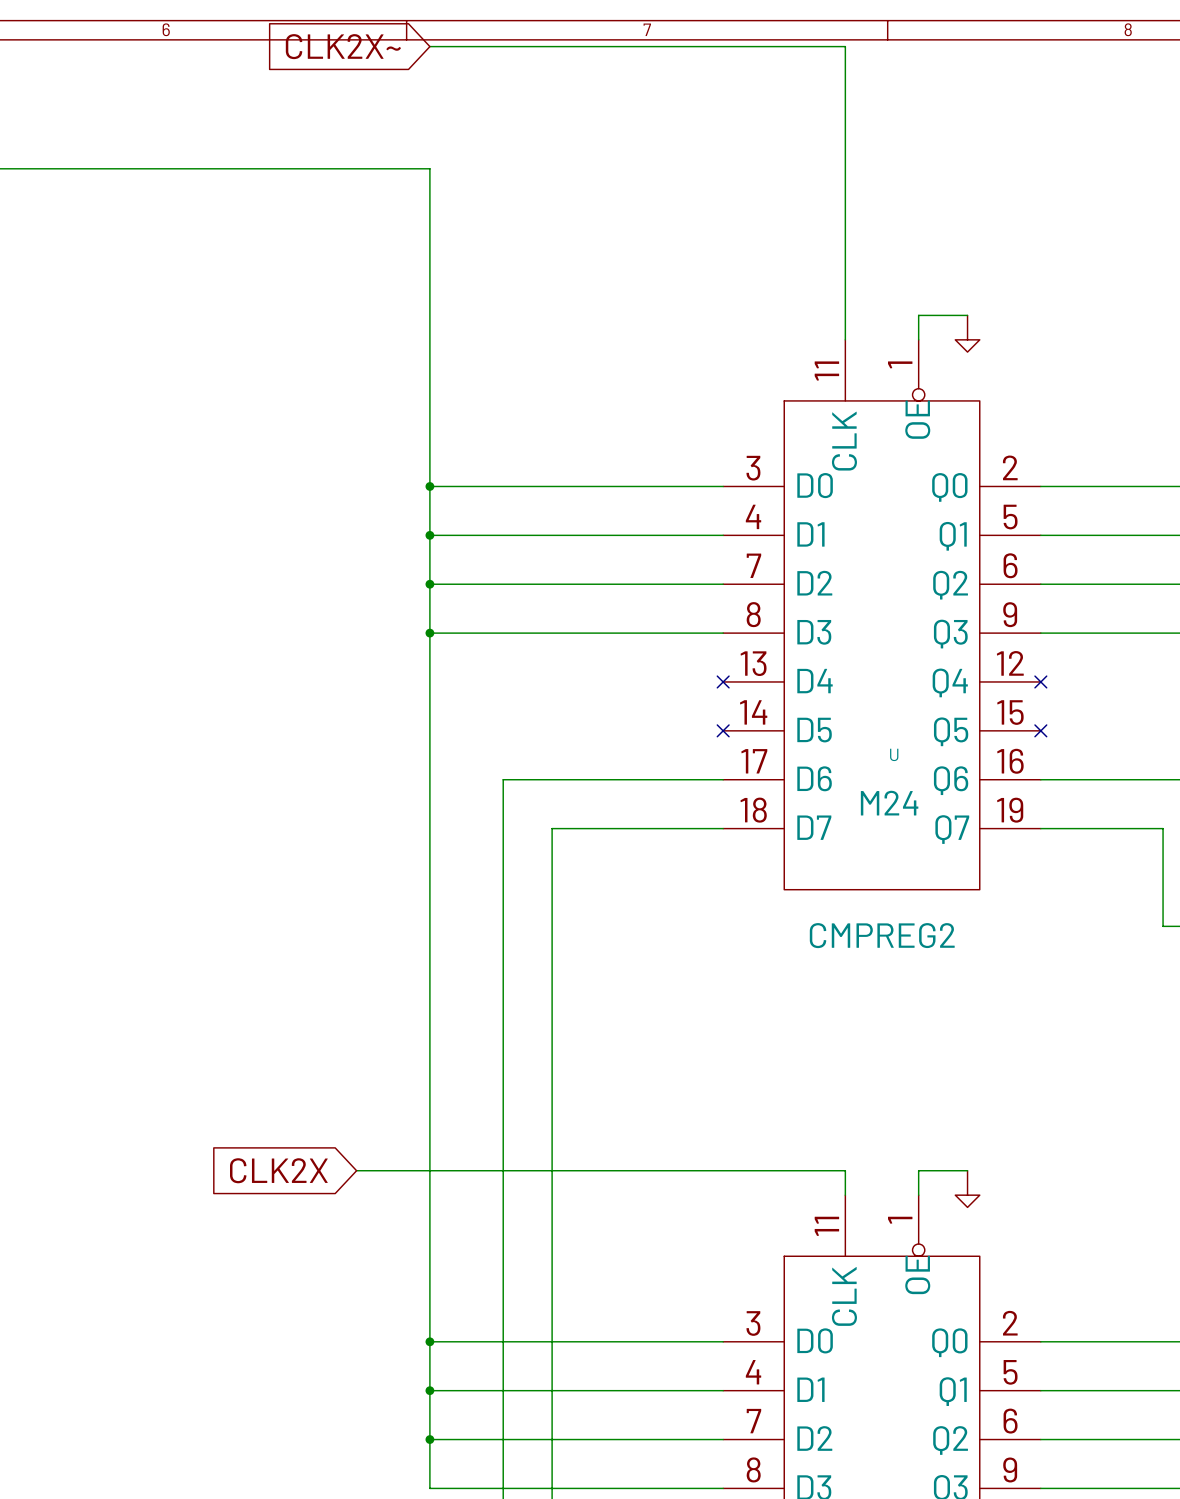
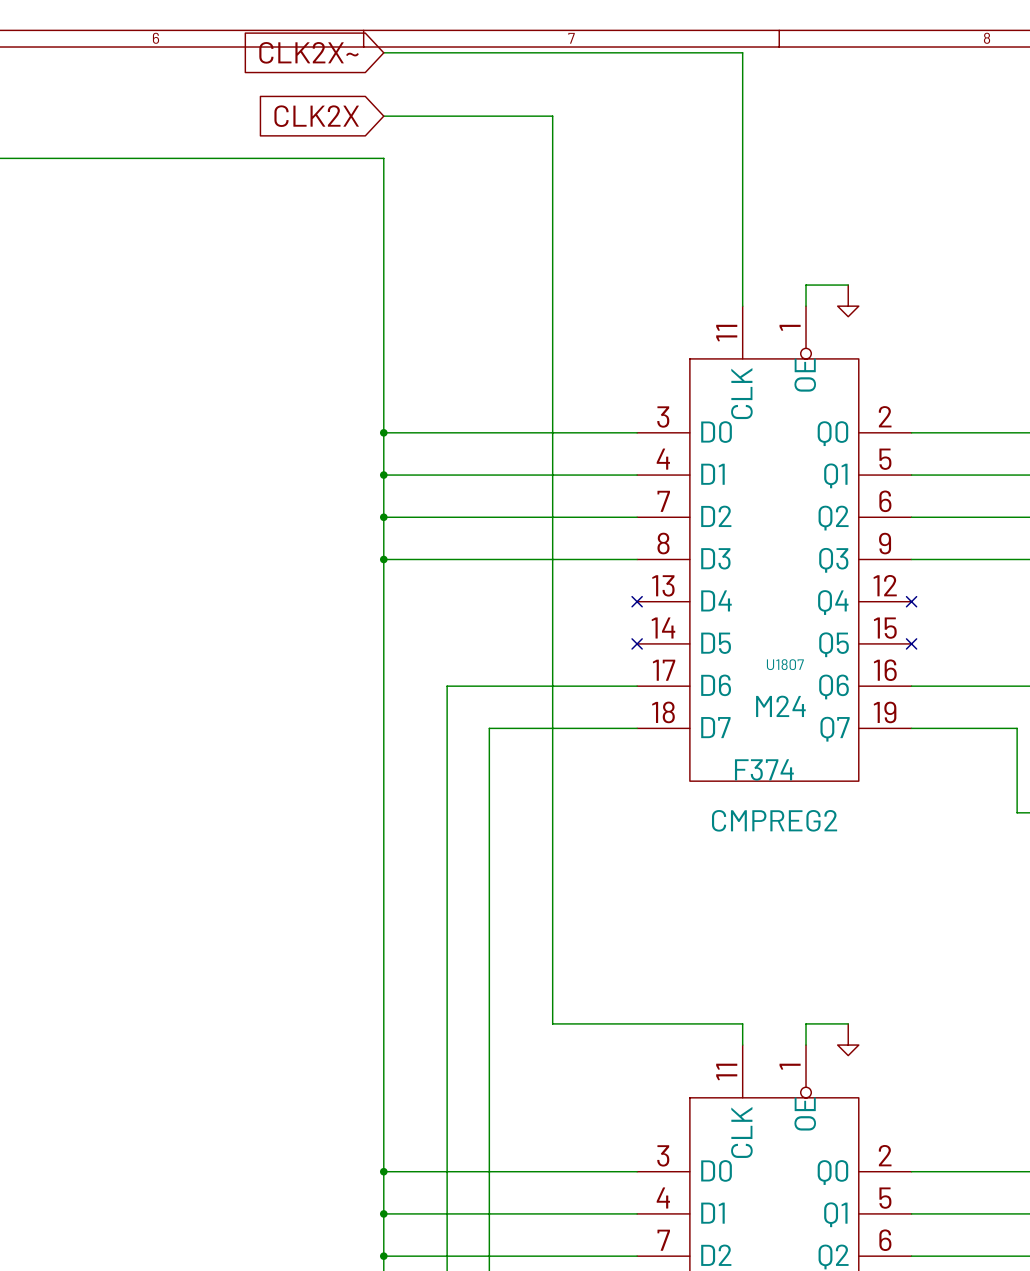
global label: none -> CLK2X (316, 116)
U name: U (894, 754) -> U1807 (785, 664)
U value: none -> F374 (764, 769)
global label: CLK2X (278, 1170) -> none
wire: (356, 1170) (625, 1170) -> (383, 116) (552, 116) (552, 1023)

